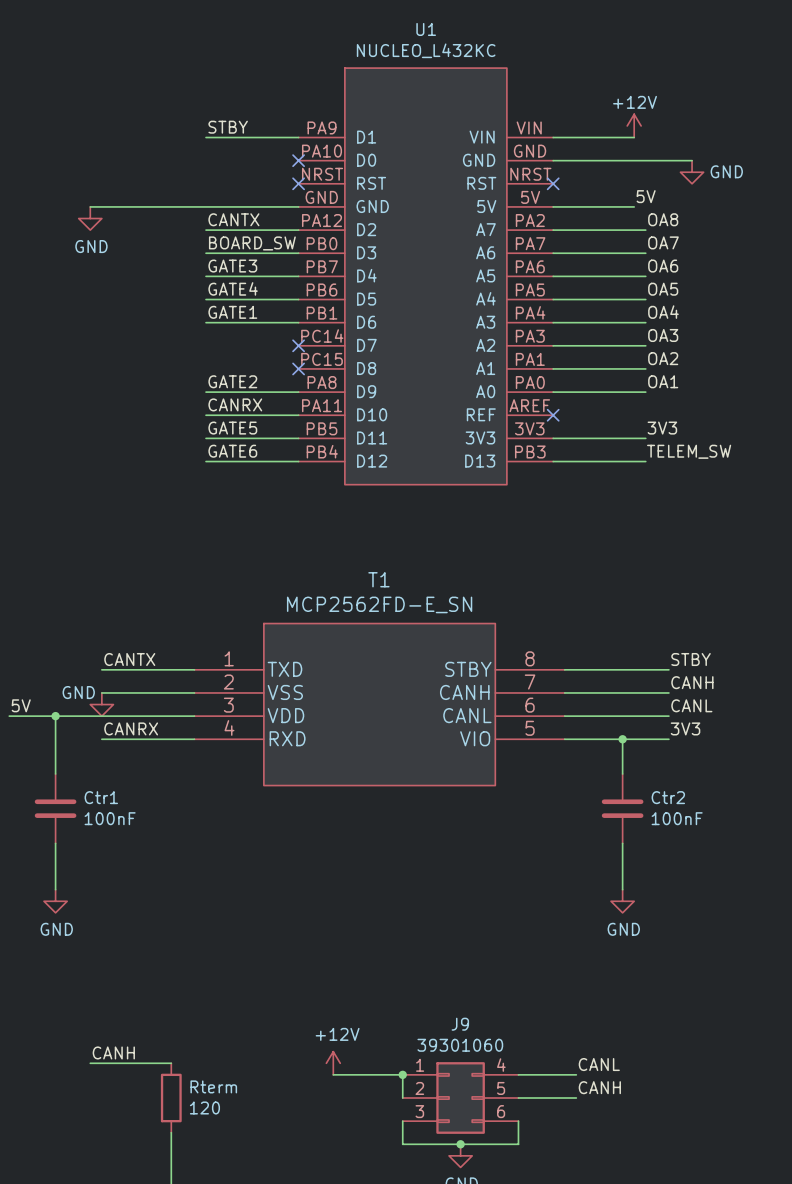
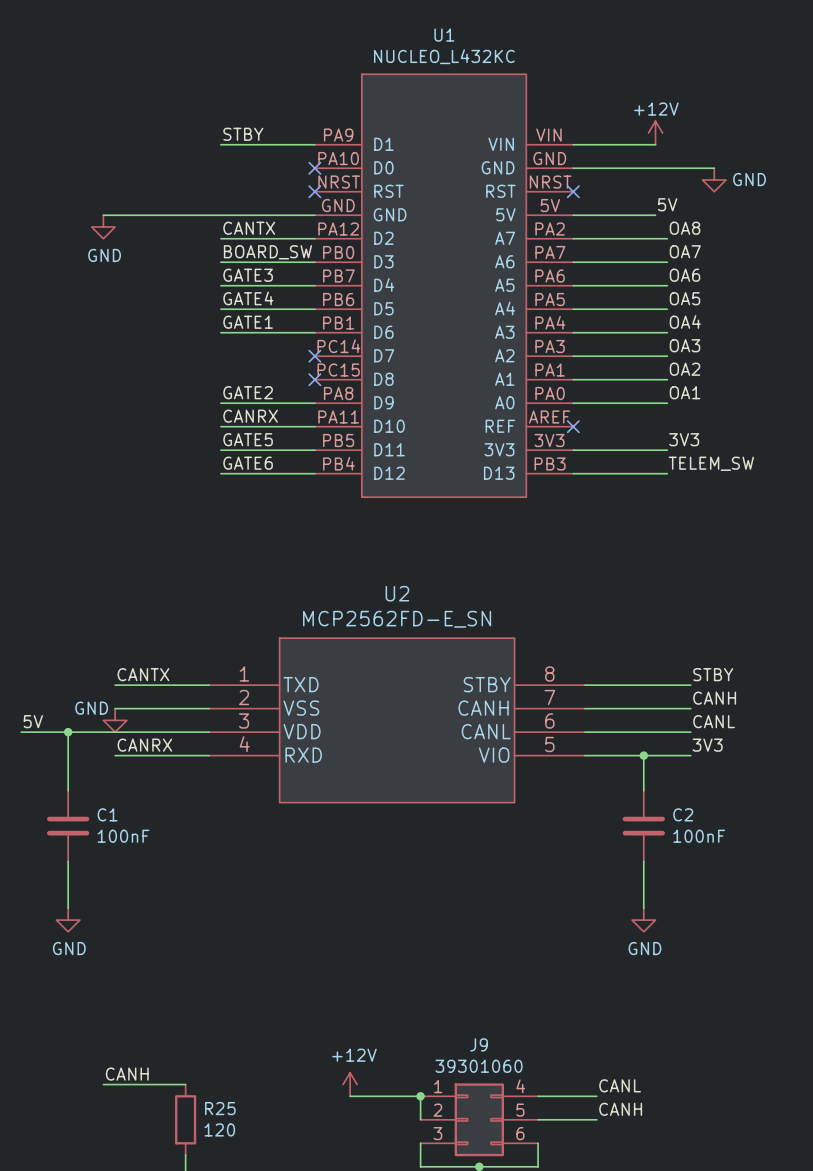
T1 name: T1 (378, 579) -> U2 (397, 593)
Ctr1 name: Ctr1 (101, 797) -> C1 (107, 814)
Ctr2 name: Ctr2 (668, 797) -> C2 (683, 814)
Rterm name: Rterm (213, 1086) -> R25 (220, 1108)

